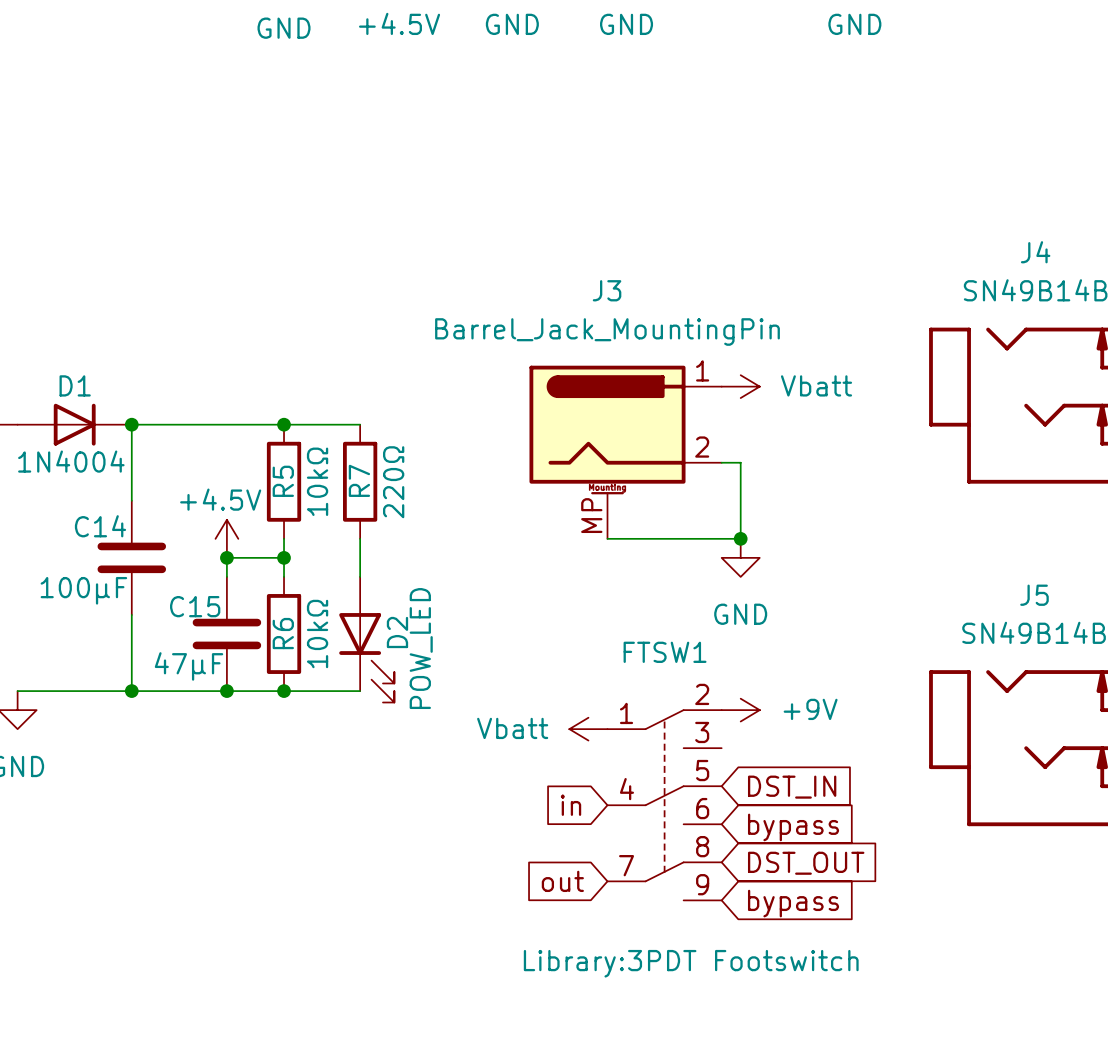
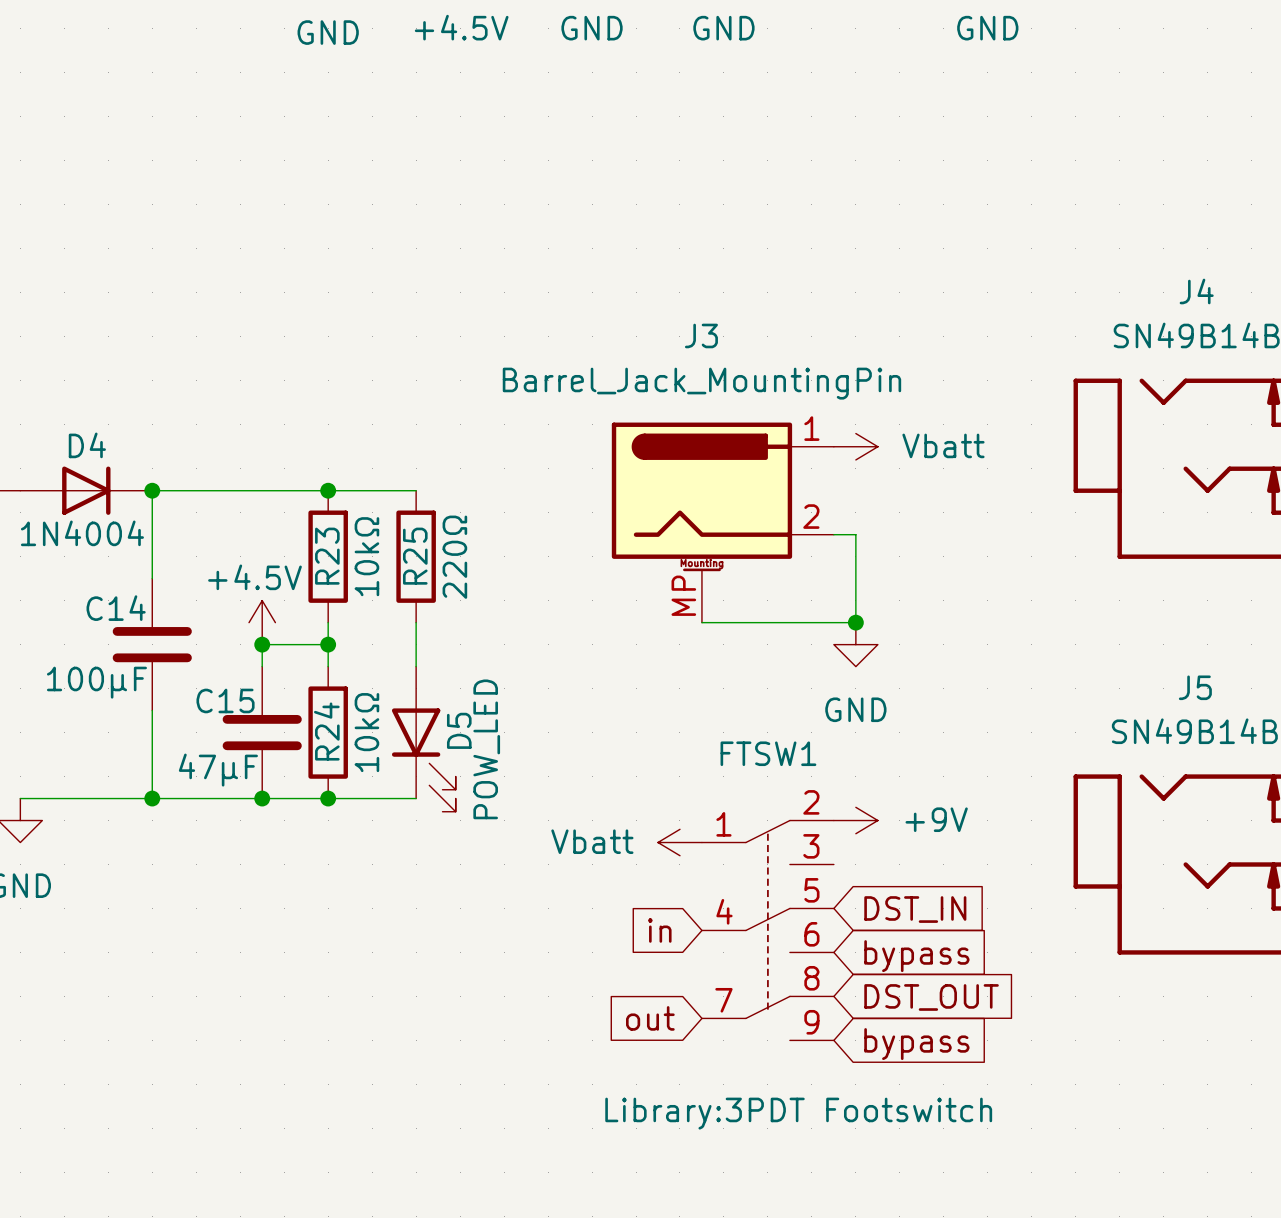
D1 name: D1 (75, 385) -> D4 (87, 445)
R7 name: R7 (359, 480) -> R25 (415, 556)
R5 name: R5 (283, 481) -> R23 (327, 556)
D2 name: D2 (397, 632) -> D5 (459, 730)
R6 name: R6 (283, 633) -> R24 (326, 731)

